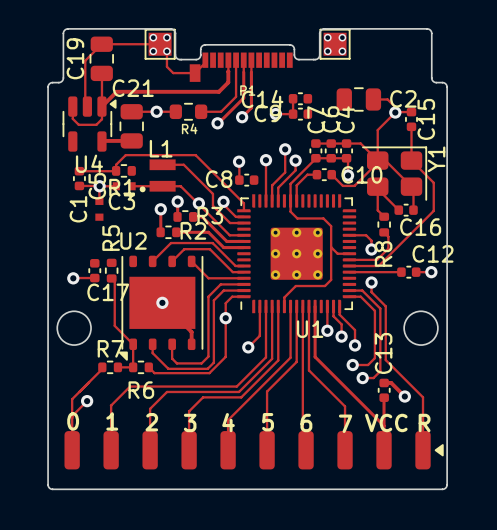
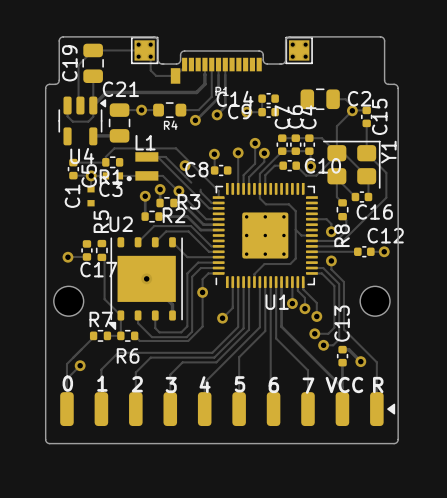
track: (212, 193) (212, 205) (230, 223) (233, 223) -> (157, 156) (209, 208)
via position: (223, 201) -> (185, 165)

